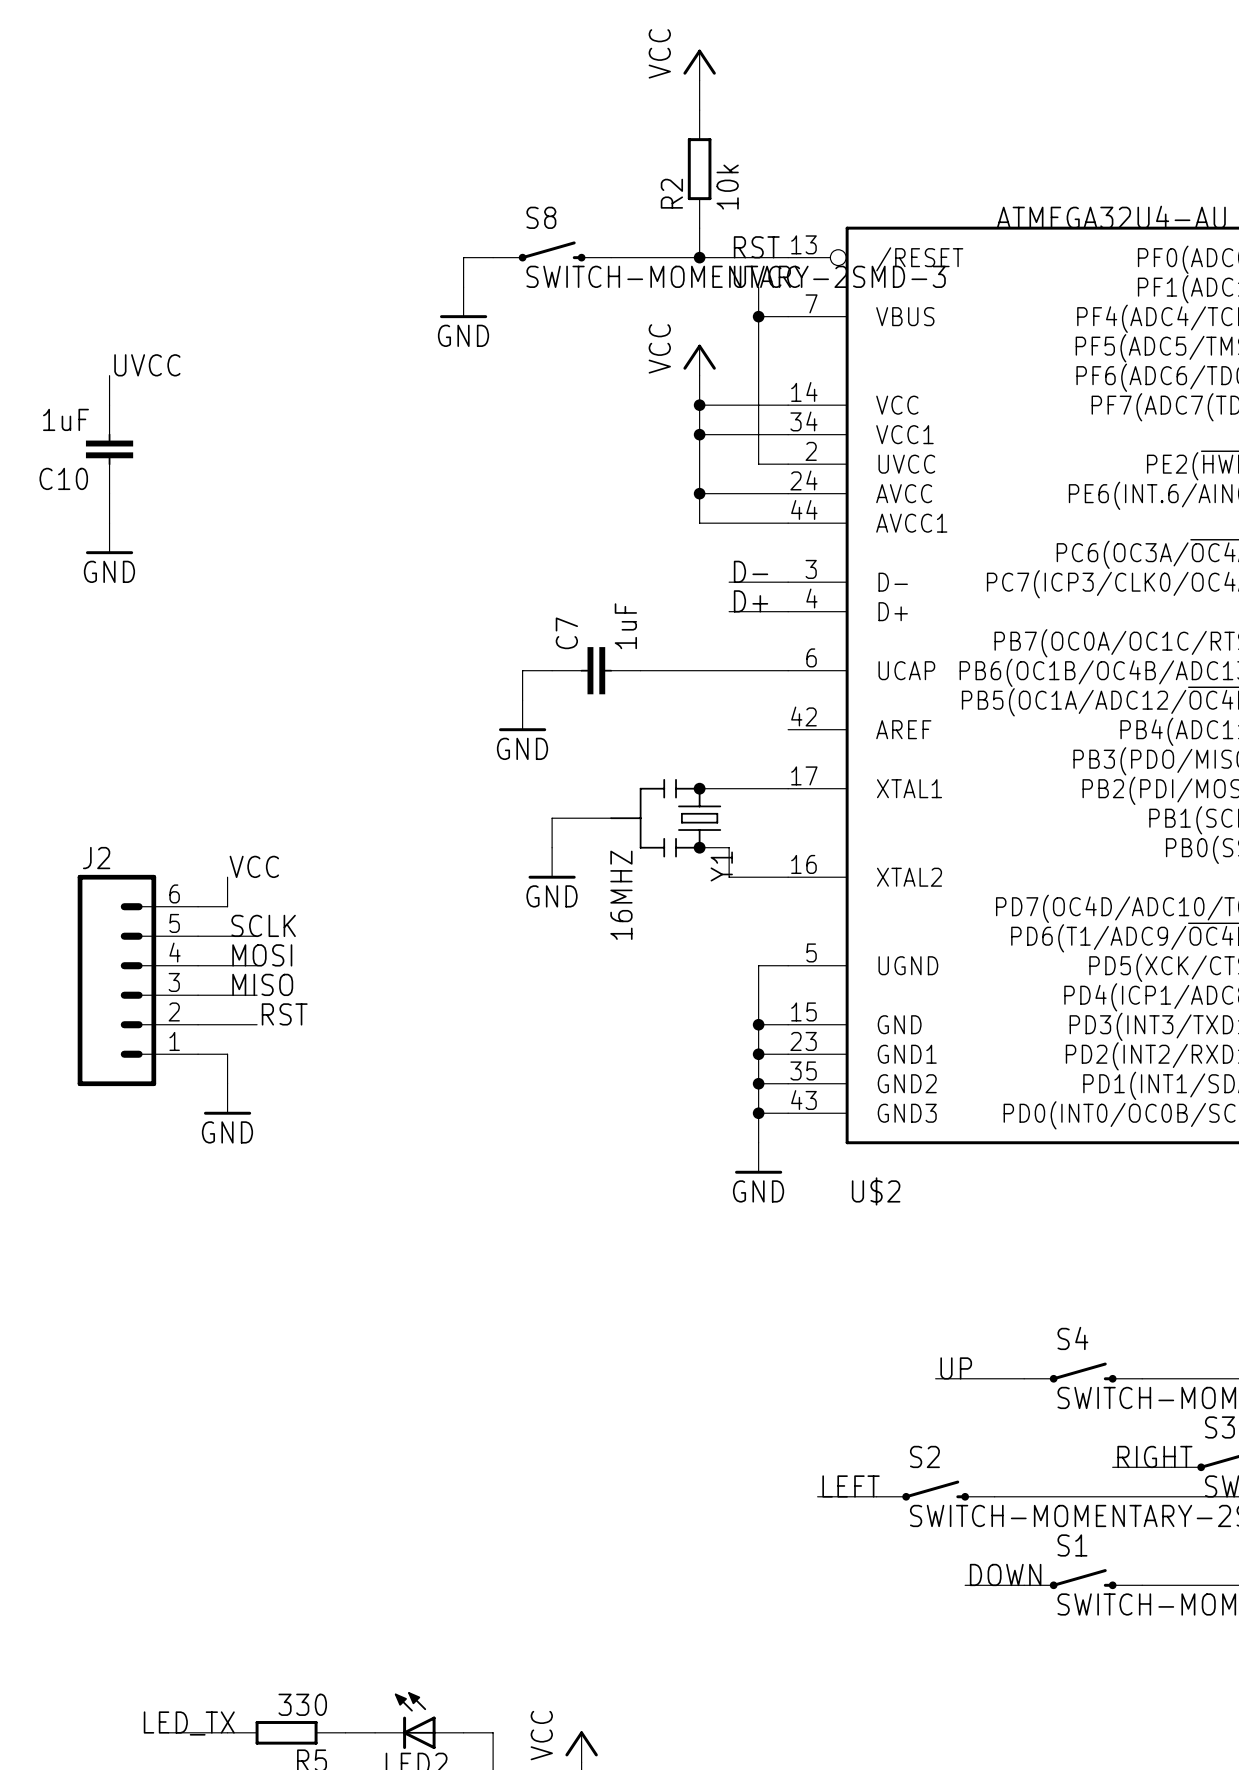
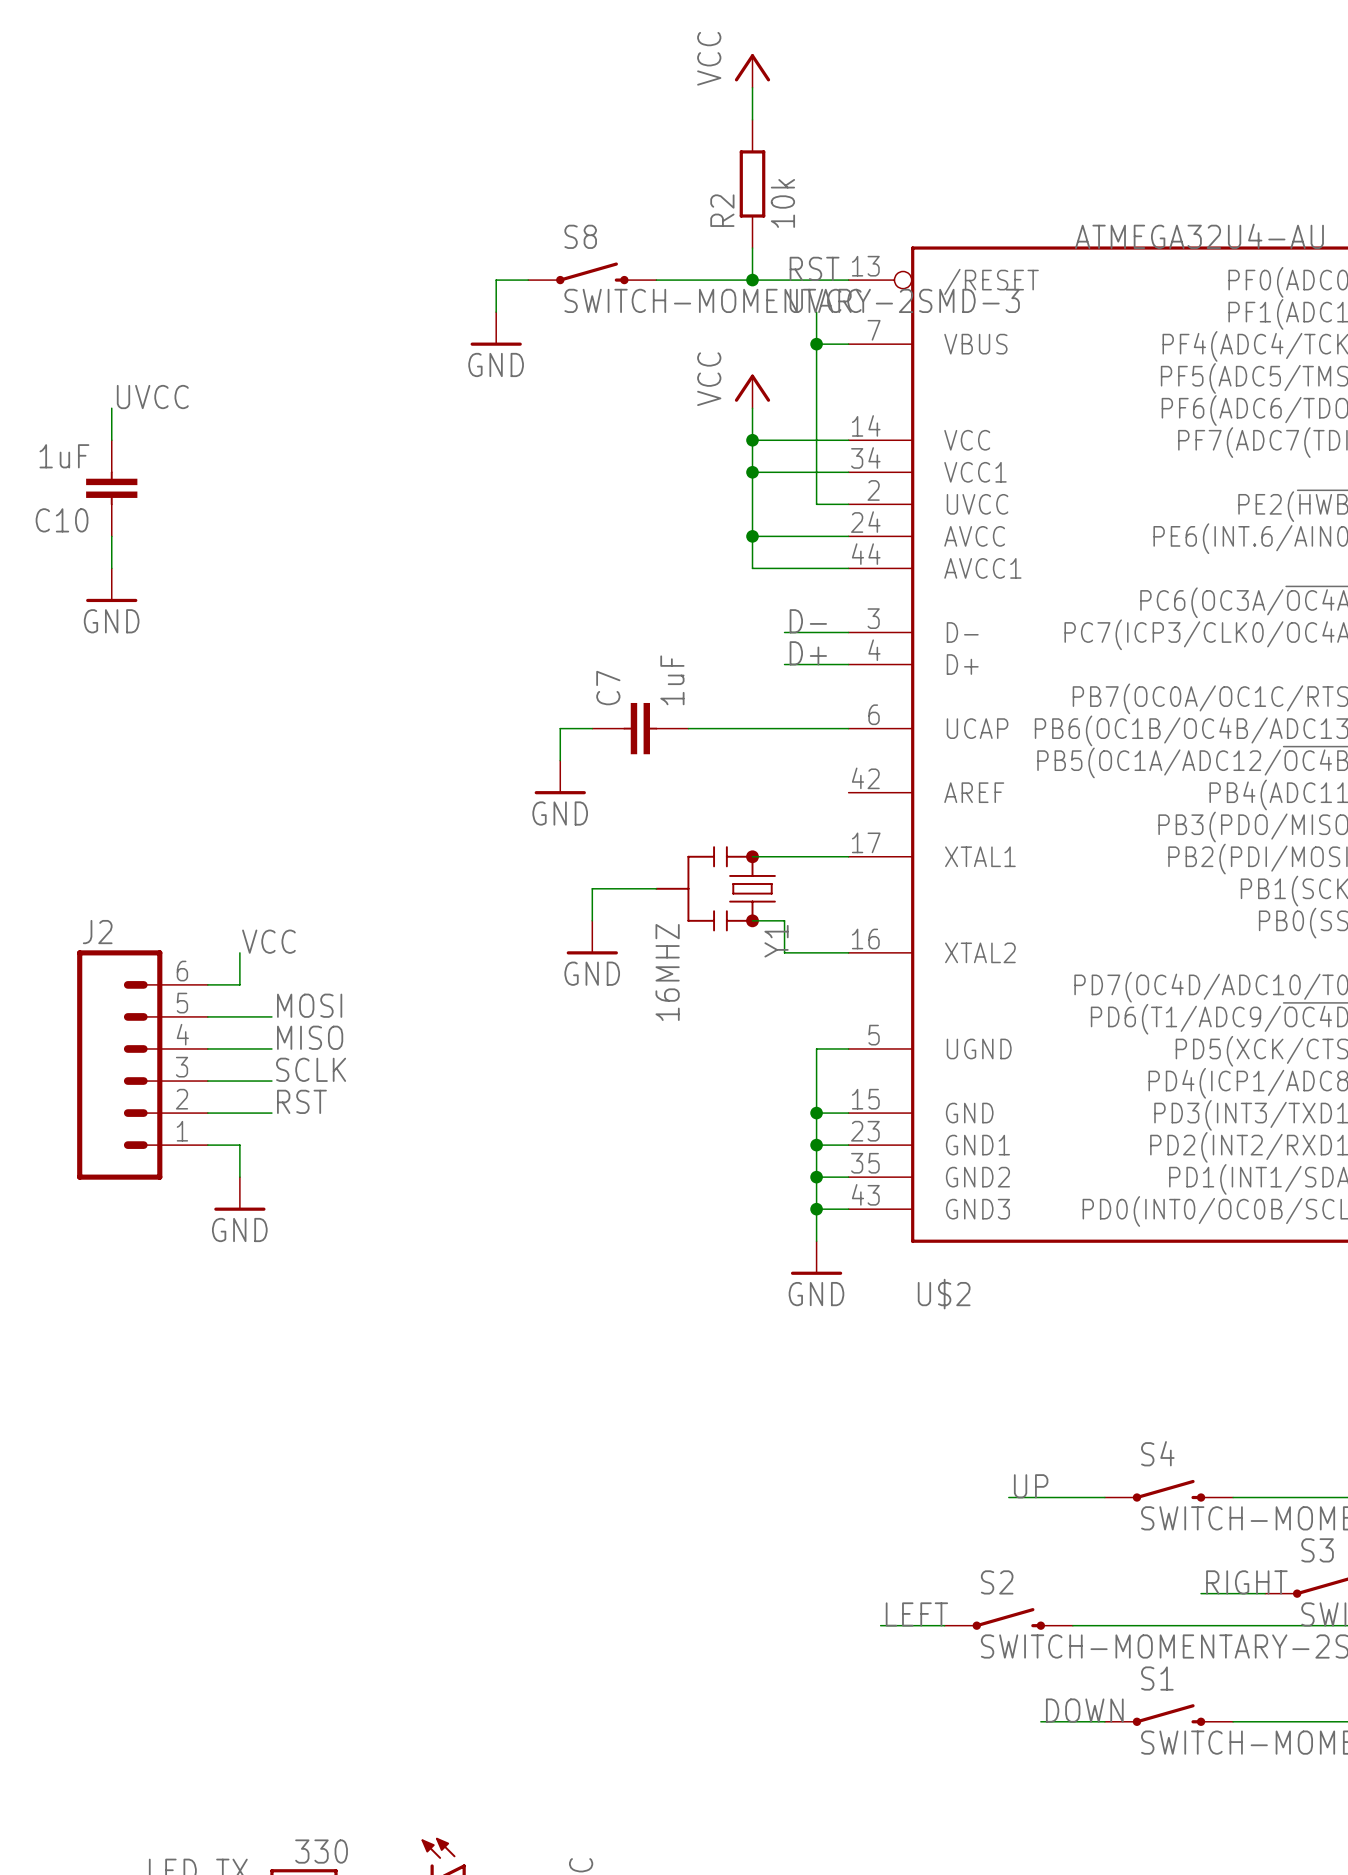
label position: SCLK (263, 925) -> SCLK (311, 1069)
label position: MOSI (262, 955) -> MOSI (309, 1005)
label position: MISO (262, 984) -> MISO (310, 1037)

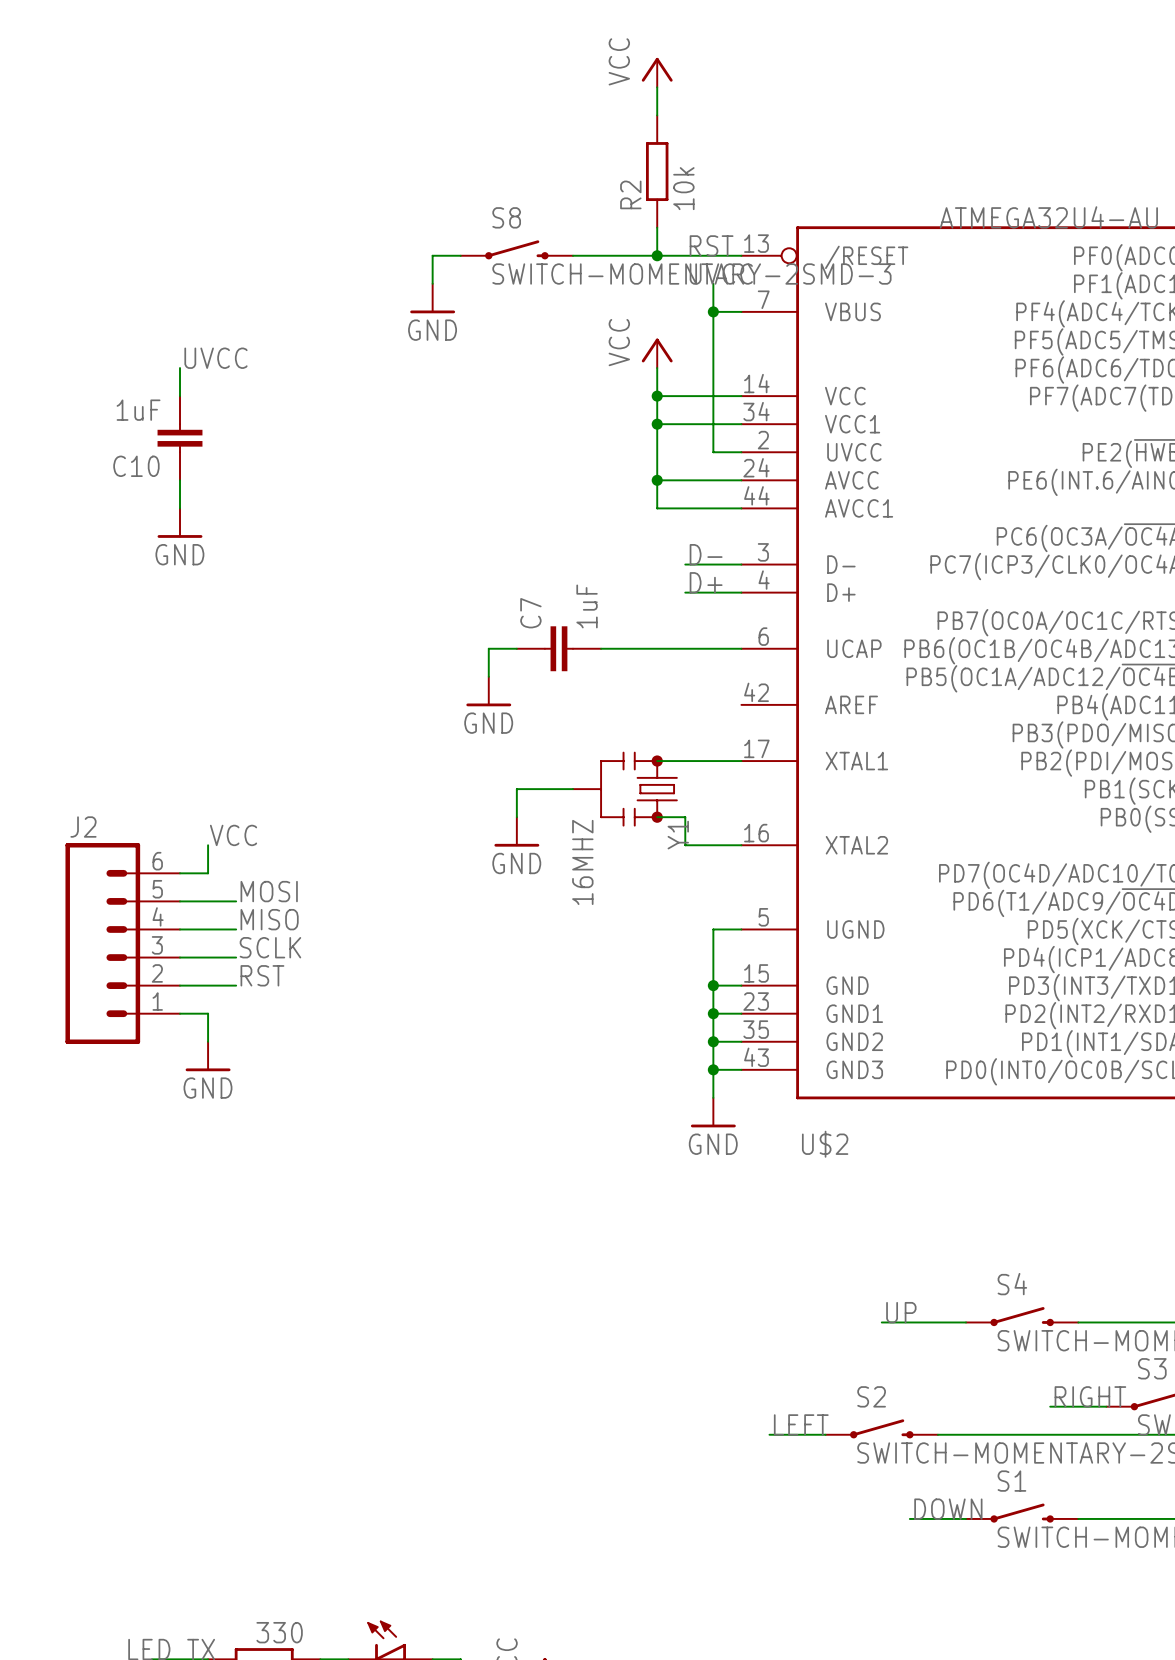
label position: UVCC (152, 397) -> UVCC (215, 358)
wire: (111, 408) (111, 440) -> (180, 368) (180, 396)
C10 position: (111, 488) -> (180, 438)
wire: (111, 536) (111, 568) -> (180, 480) (180, 508)
power symbol position: GND (111, 585) -> GND (180, 523)

